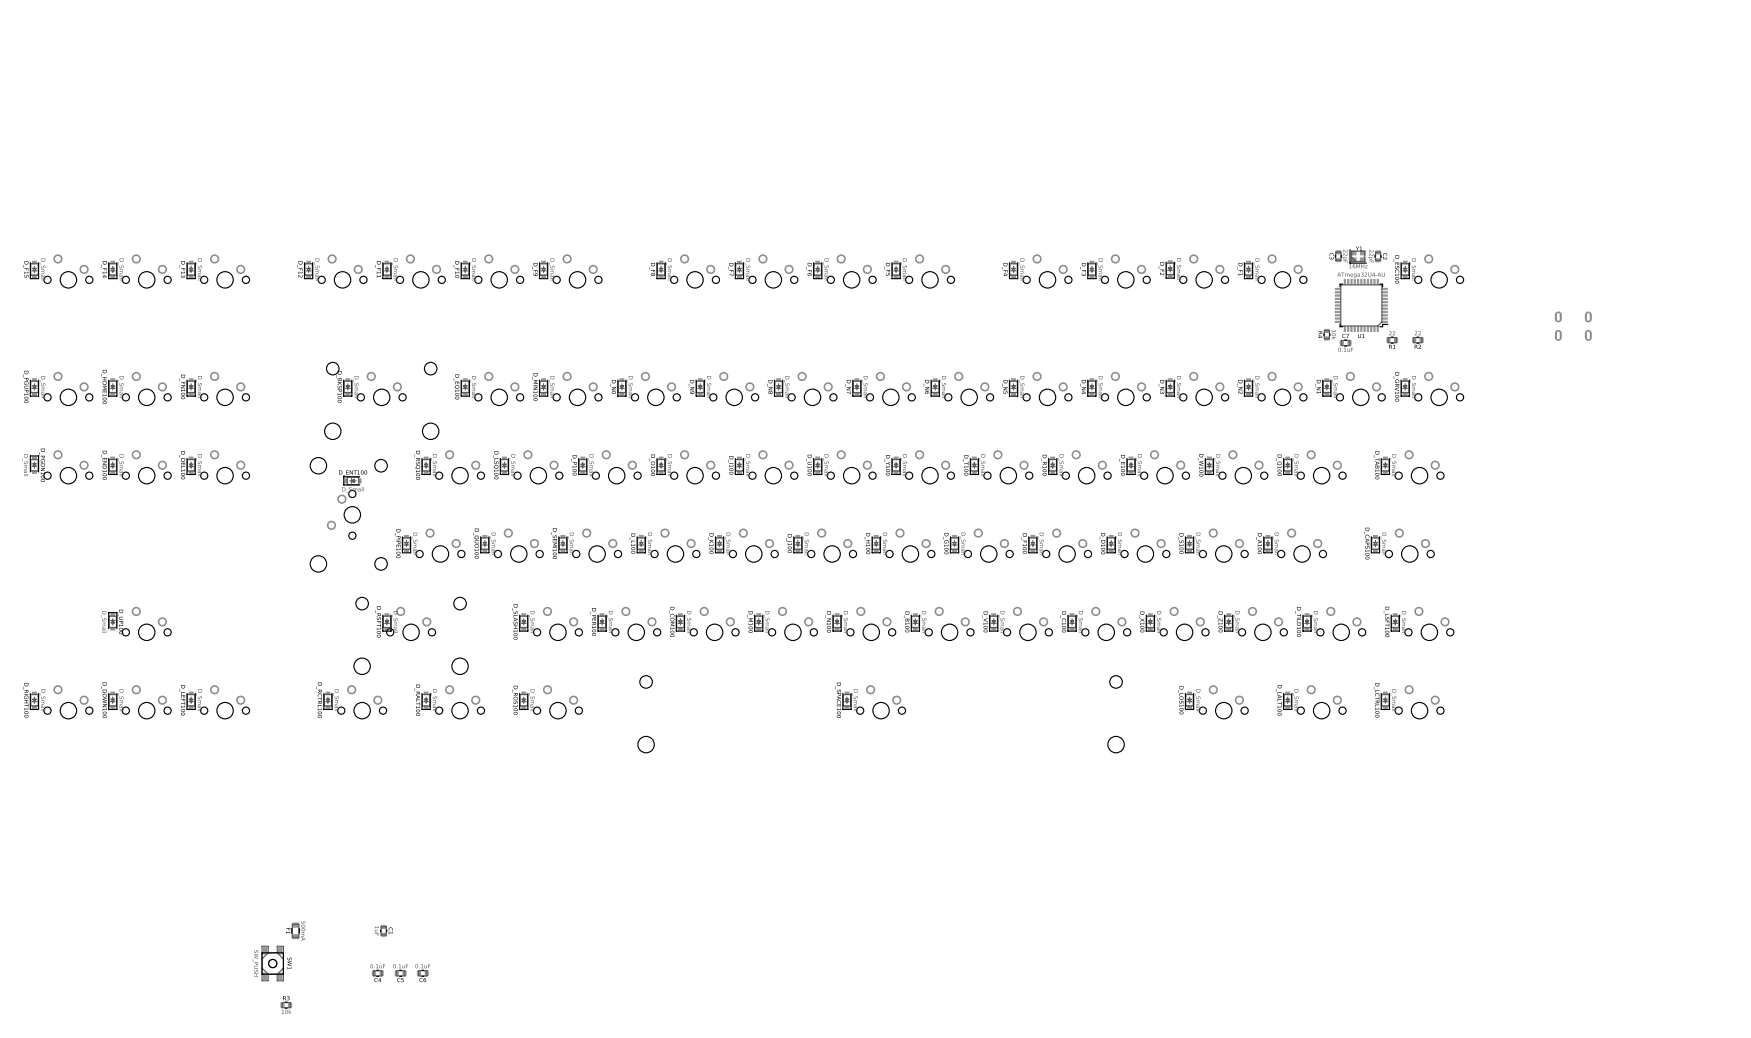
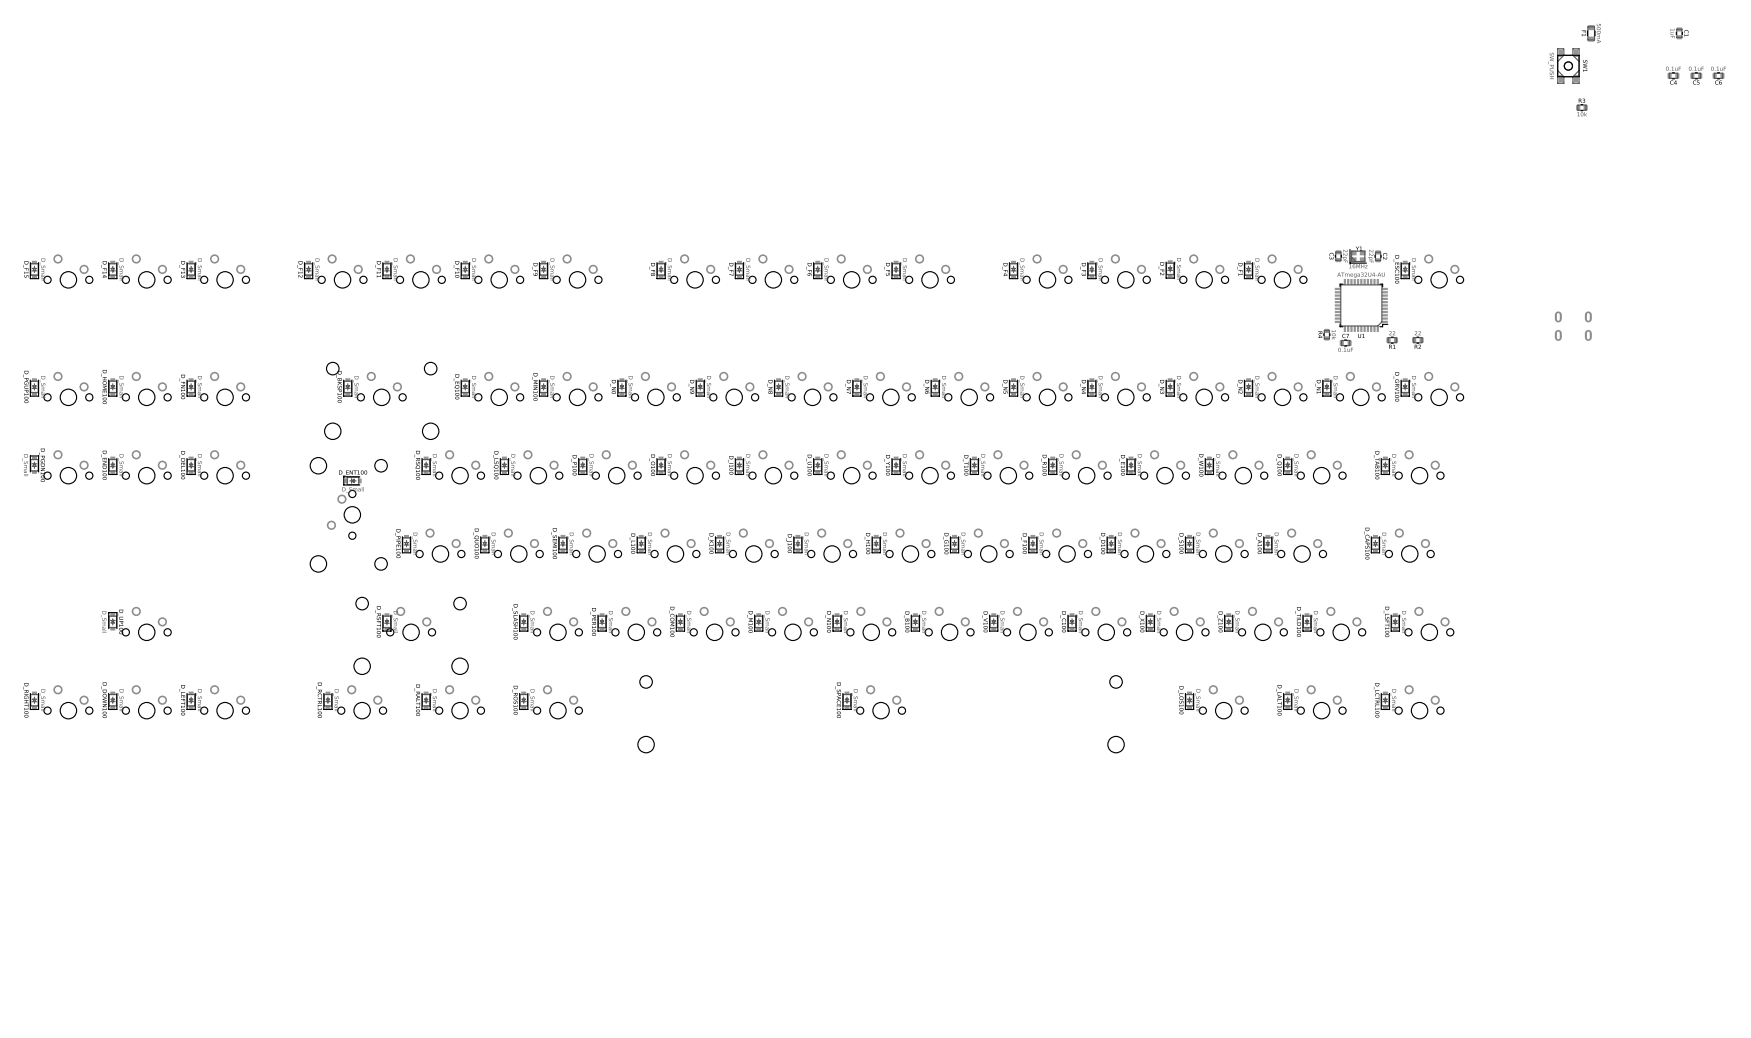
part position: (295, 930) -> (1591, 33)
part position: (383, 930) -> (1679, 33)
part position: (272, 963) -> (1568, 66)
part position: (377, 973) -> (1673, 75)
part position: (400, 973) -> (1696, 75)
part position: (422, 973) -> (1718, 75)
part position: (286, 1005) -> (1581, 107)

